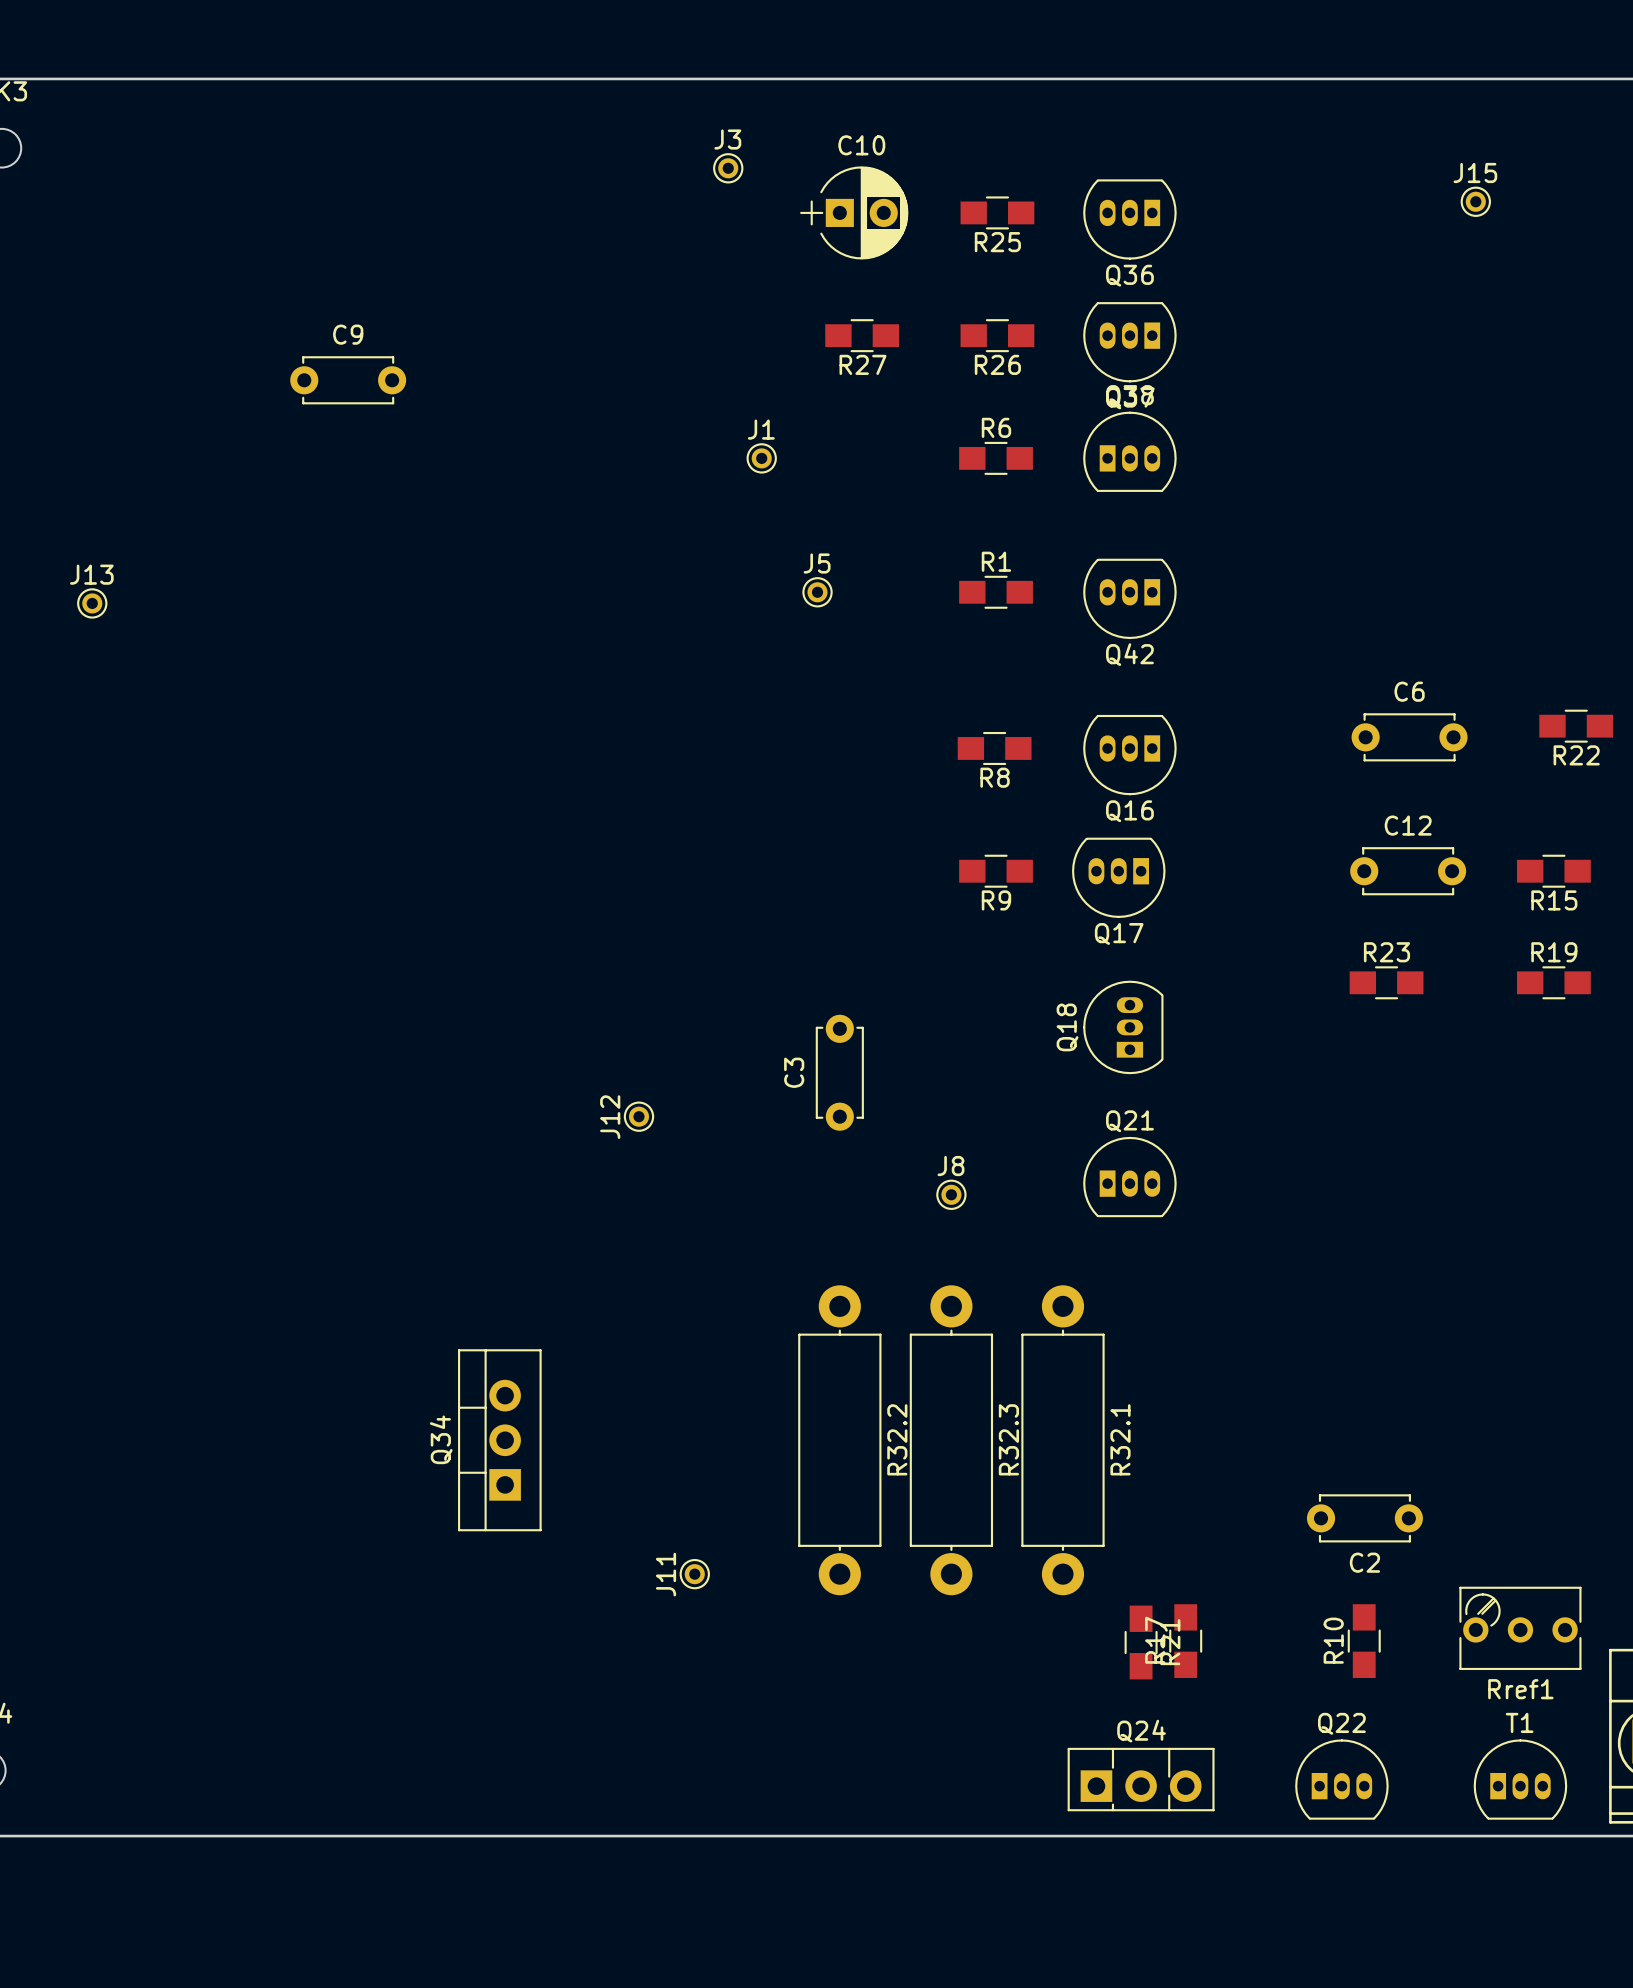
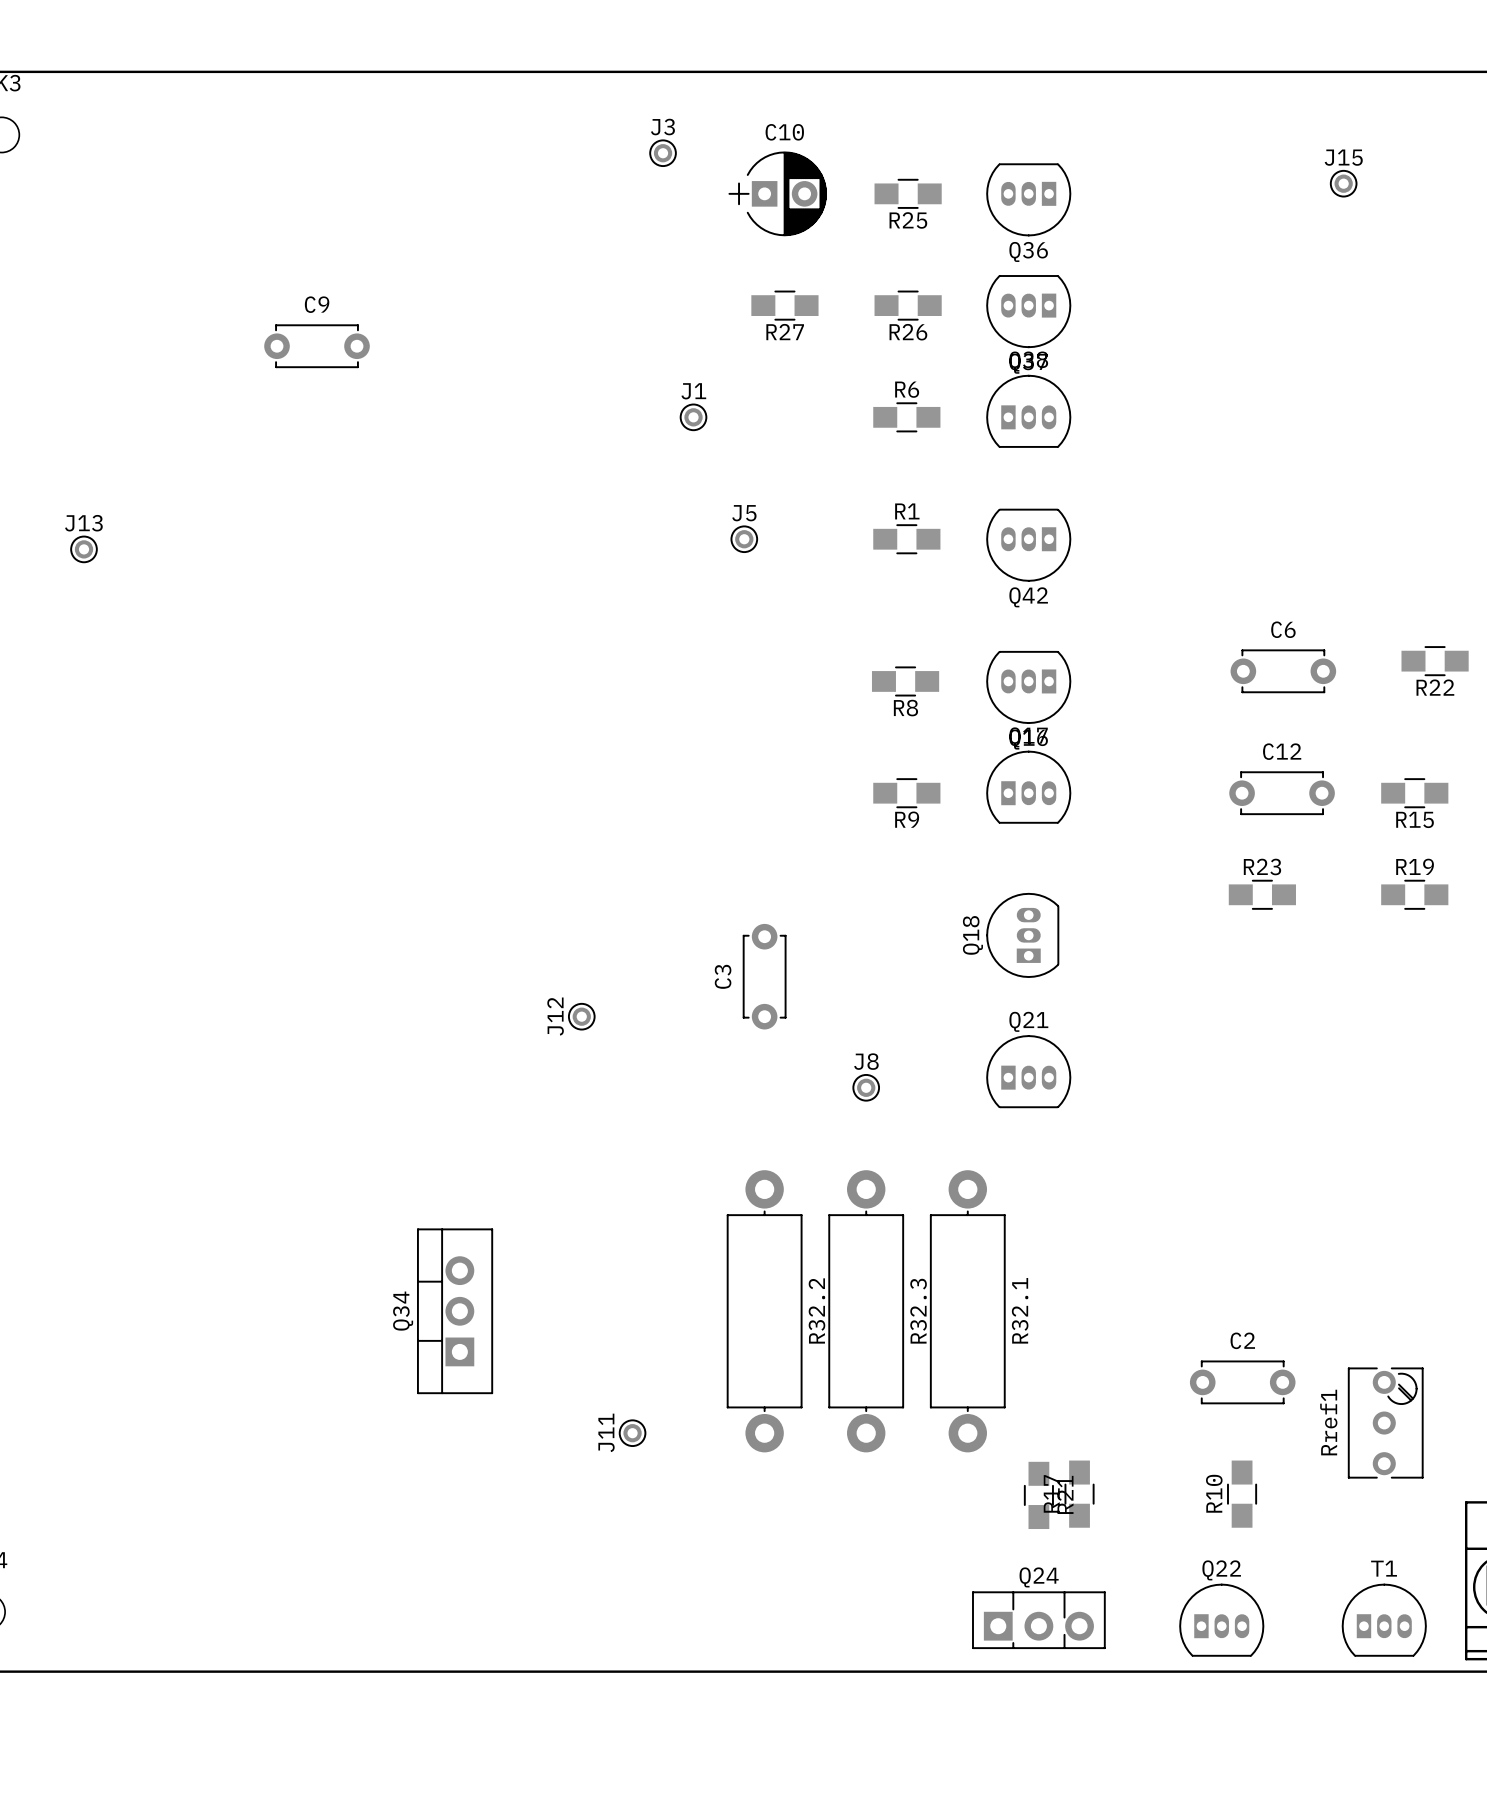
Q17 rotation: 0° (1118, 877) -> 180° (1028, 787)
C2 name position: C2 (1364, 1562) -> C2 (1242, 1340)
Rref1 rotation: 0° (1520, 1628) -> 90° clockwise (1385, 1423)

